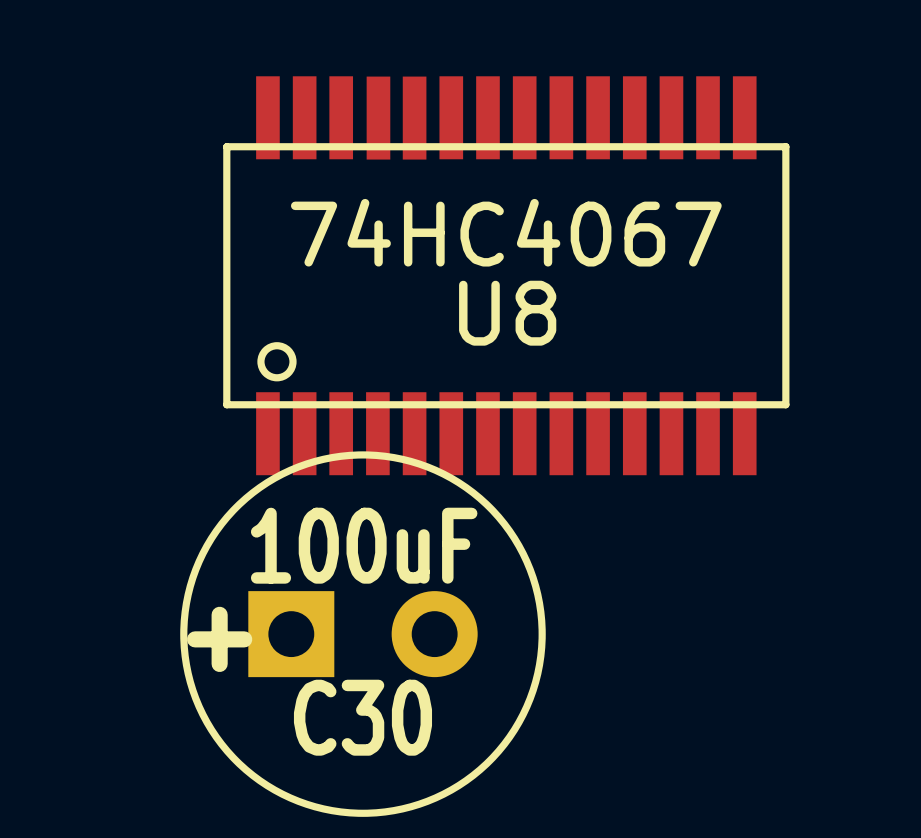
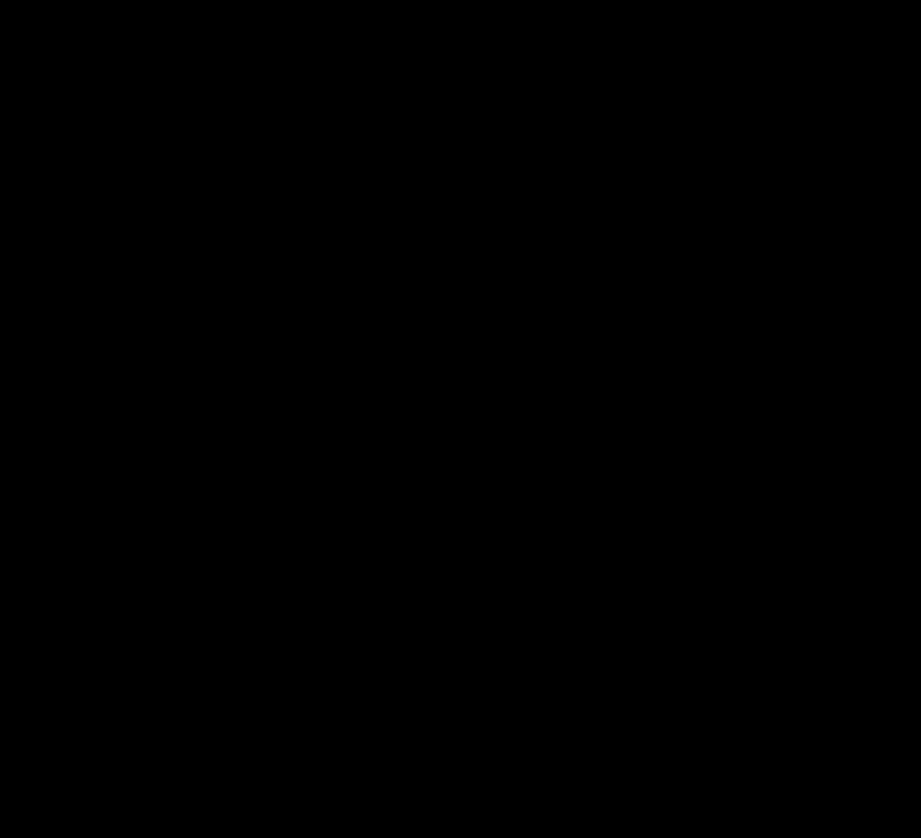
U8: 74HC4067 (506, 275) -> none
C30: 100uF (362, 634) -> none

